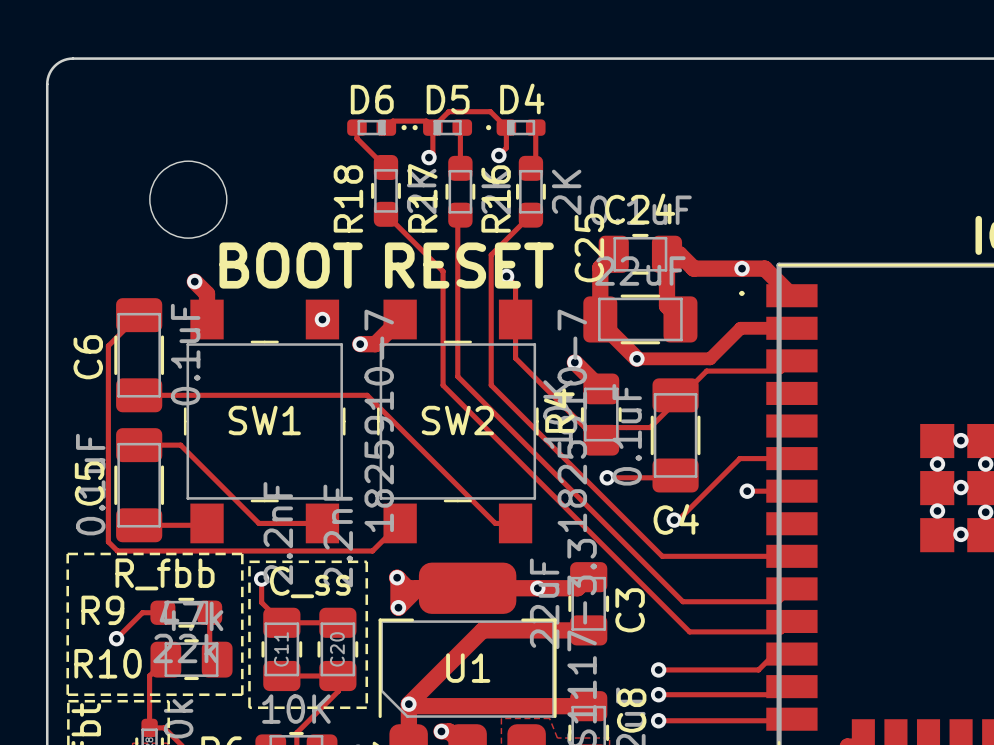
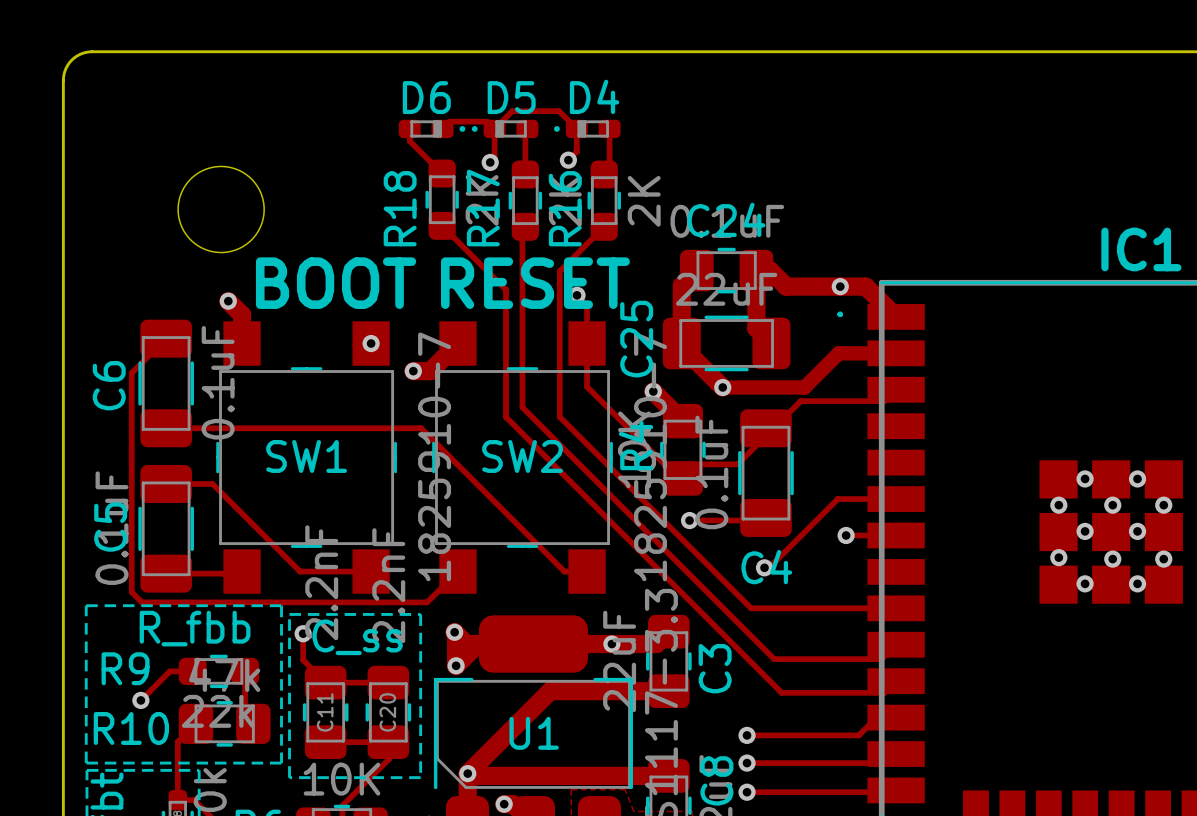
C25 name position: C25 (589, 248) -> C25 (636, 339)

